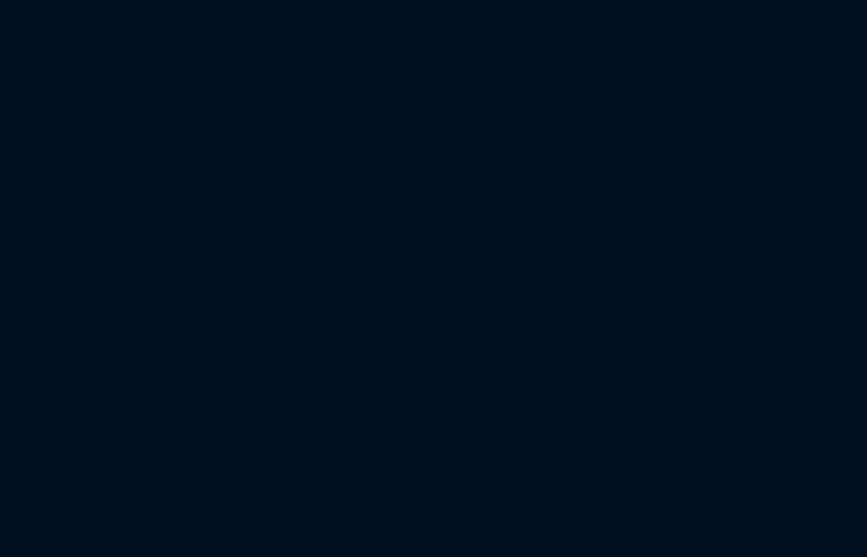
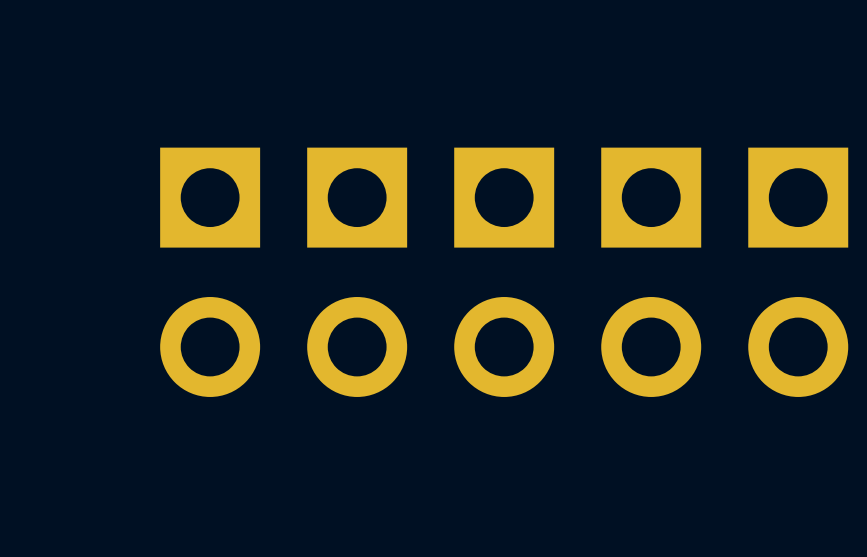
part: none -> (210, 272)
part: none -> (357, 272)
part: none -> (504, 272)
part: none -> (651, 272)
part: none -> (798, 272)

